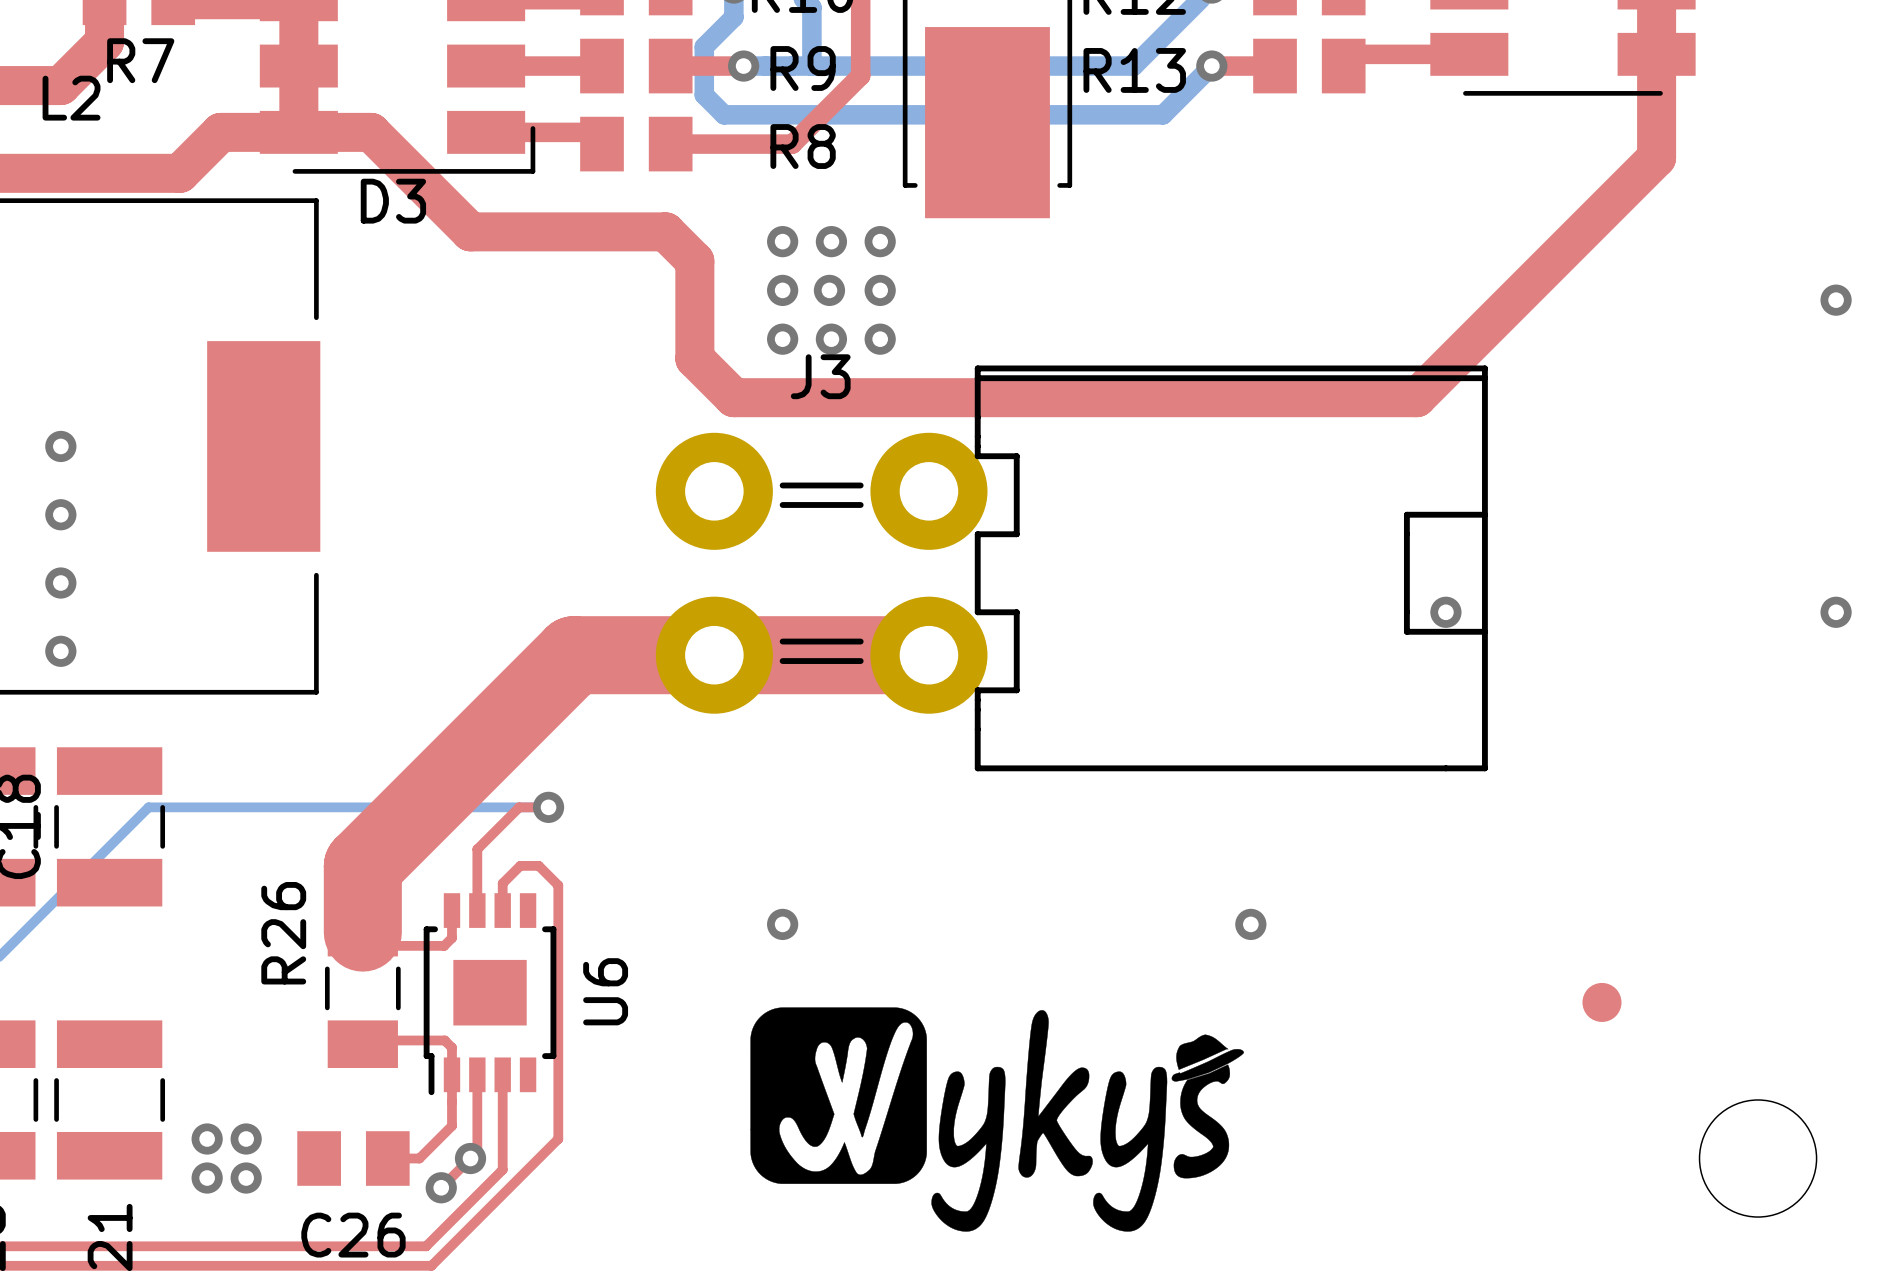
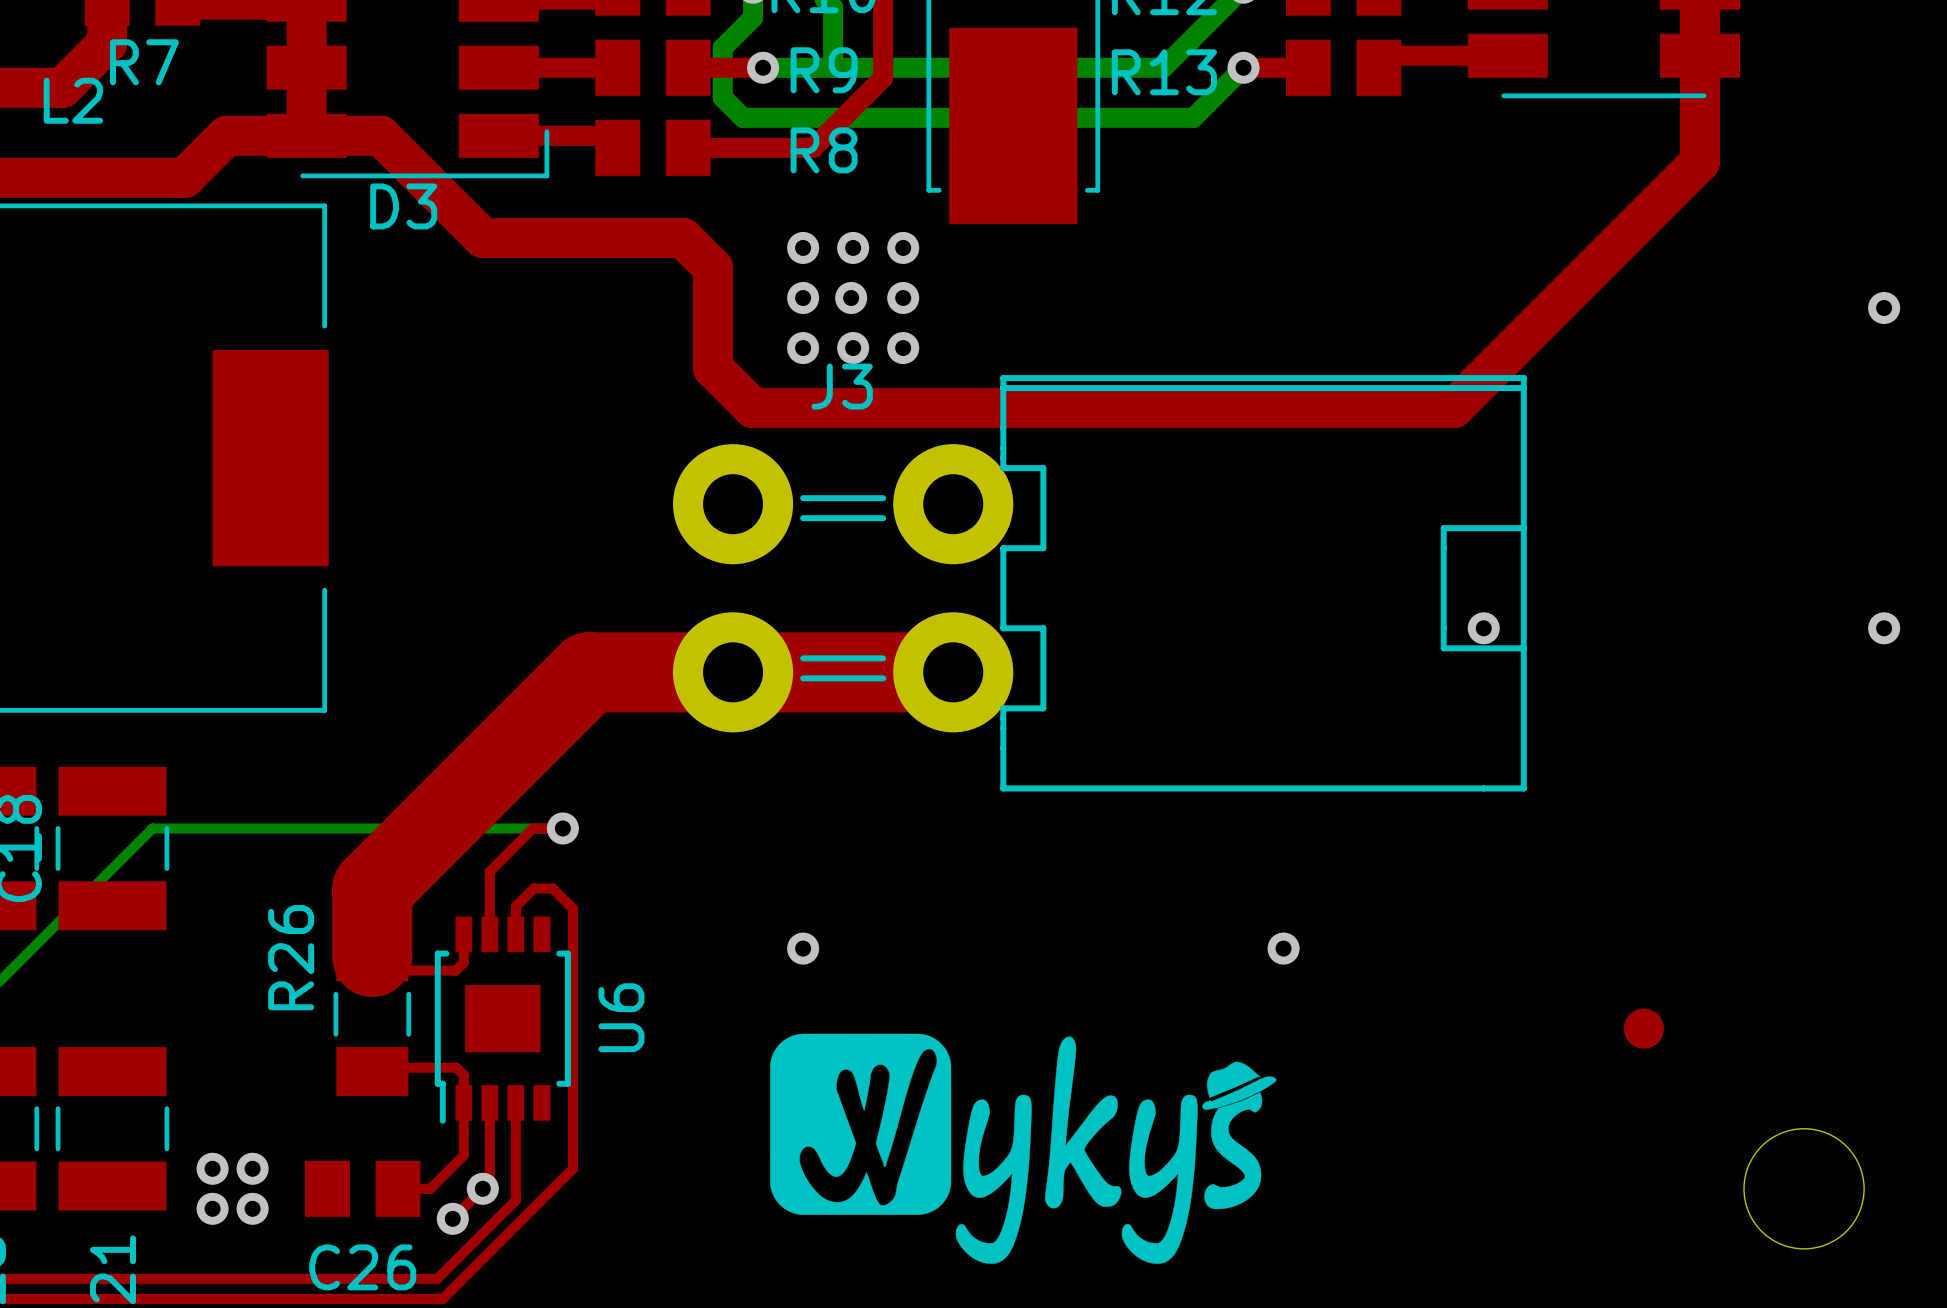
via: (60, 446) -> none
via: (60, 514) -> none
via: (60, 583) -> none
via: (60, 651) -> none

